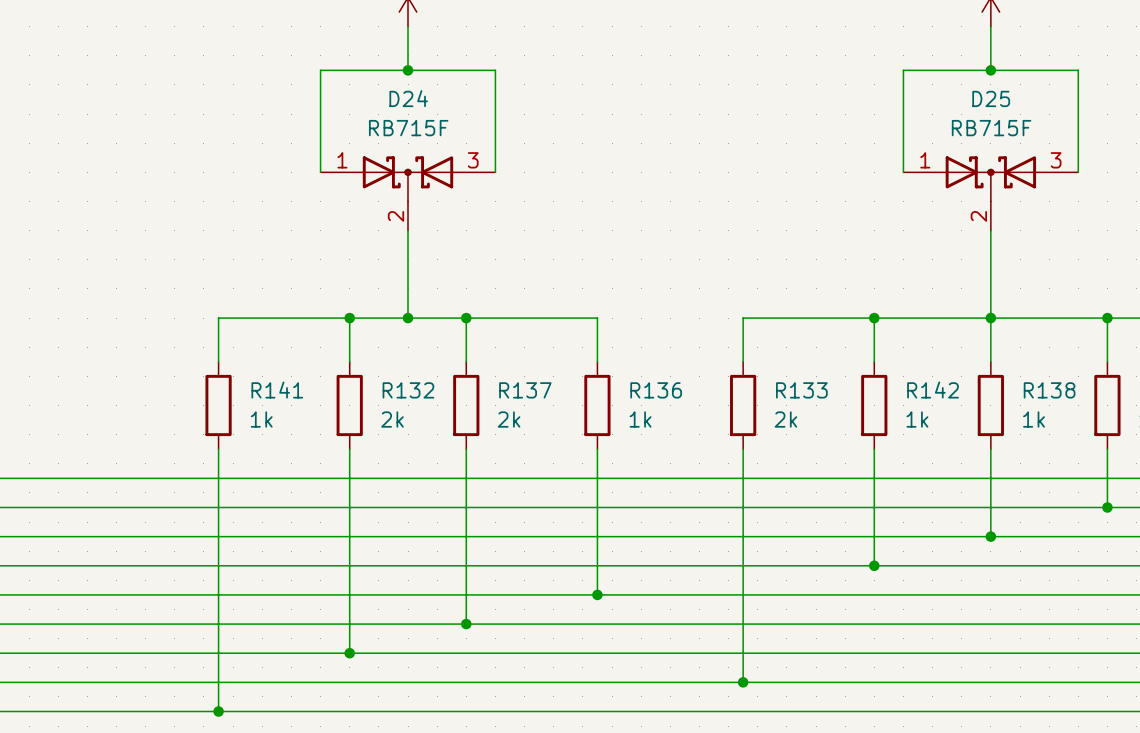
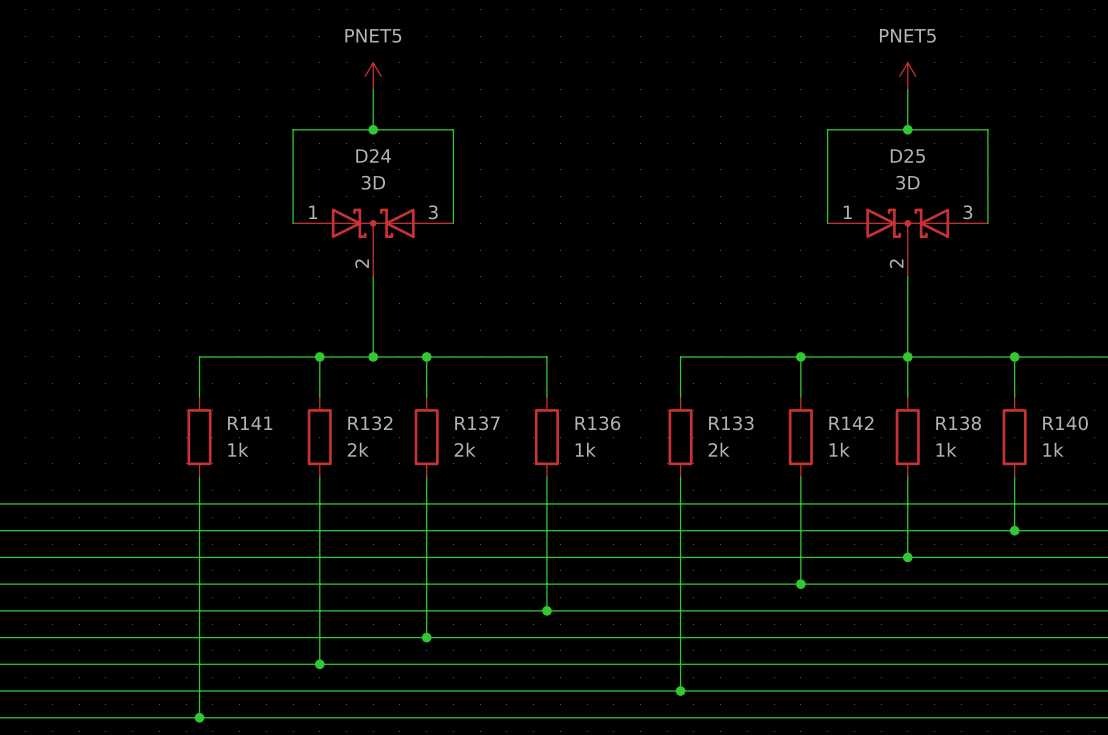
D24 value: RB715F (408, 128) -> 3D (373, 182)
D25 value: RB715F (991, 128) -> 3D (907, 182)

